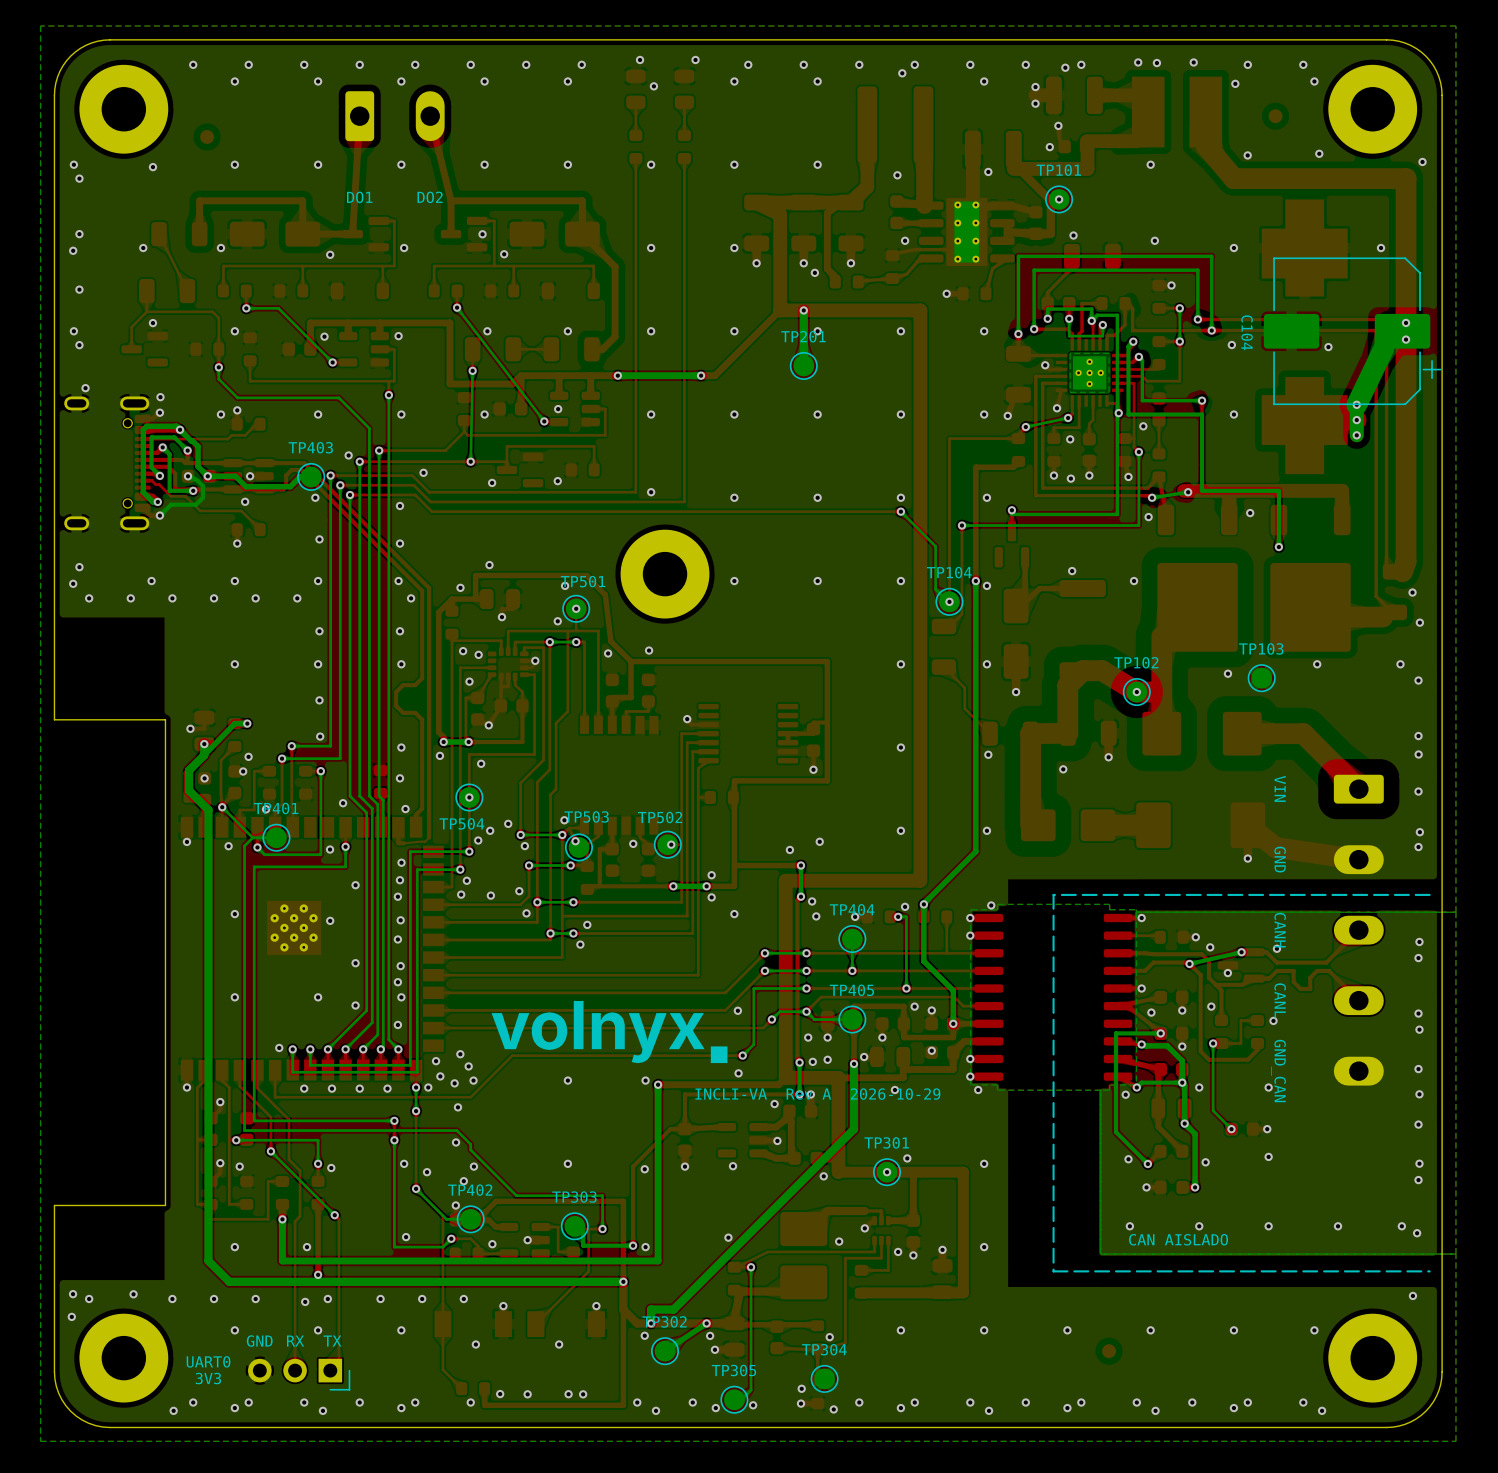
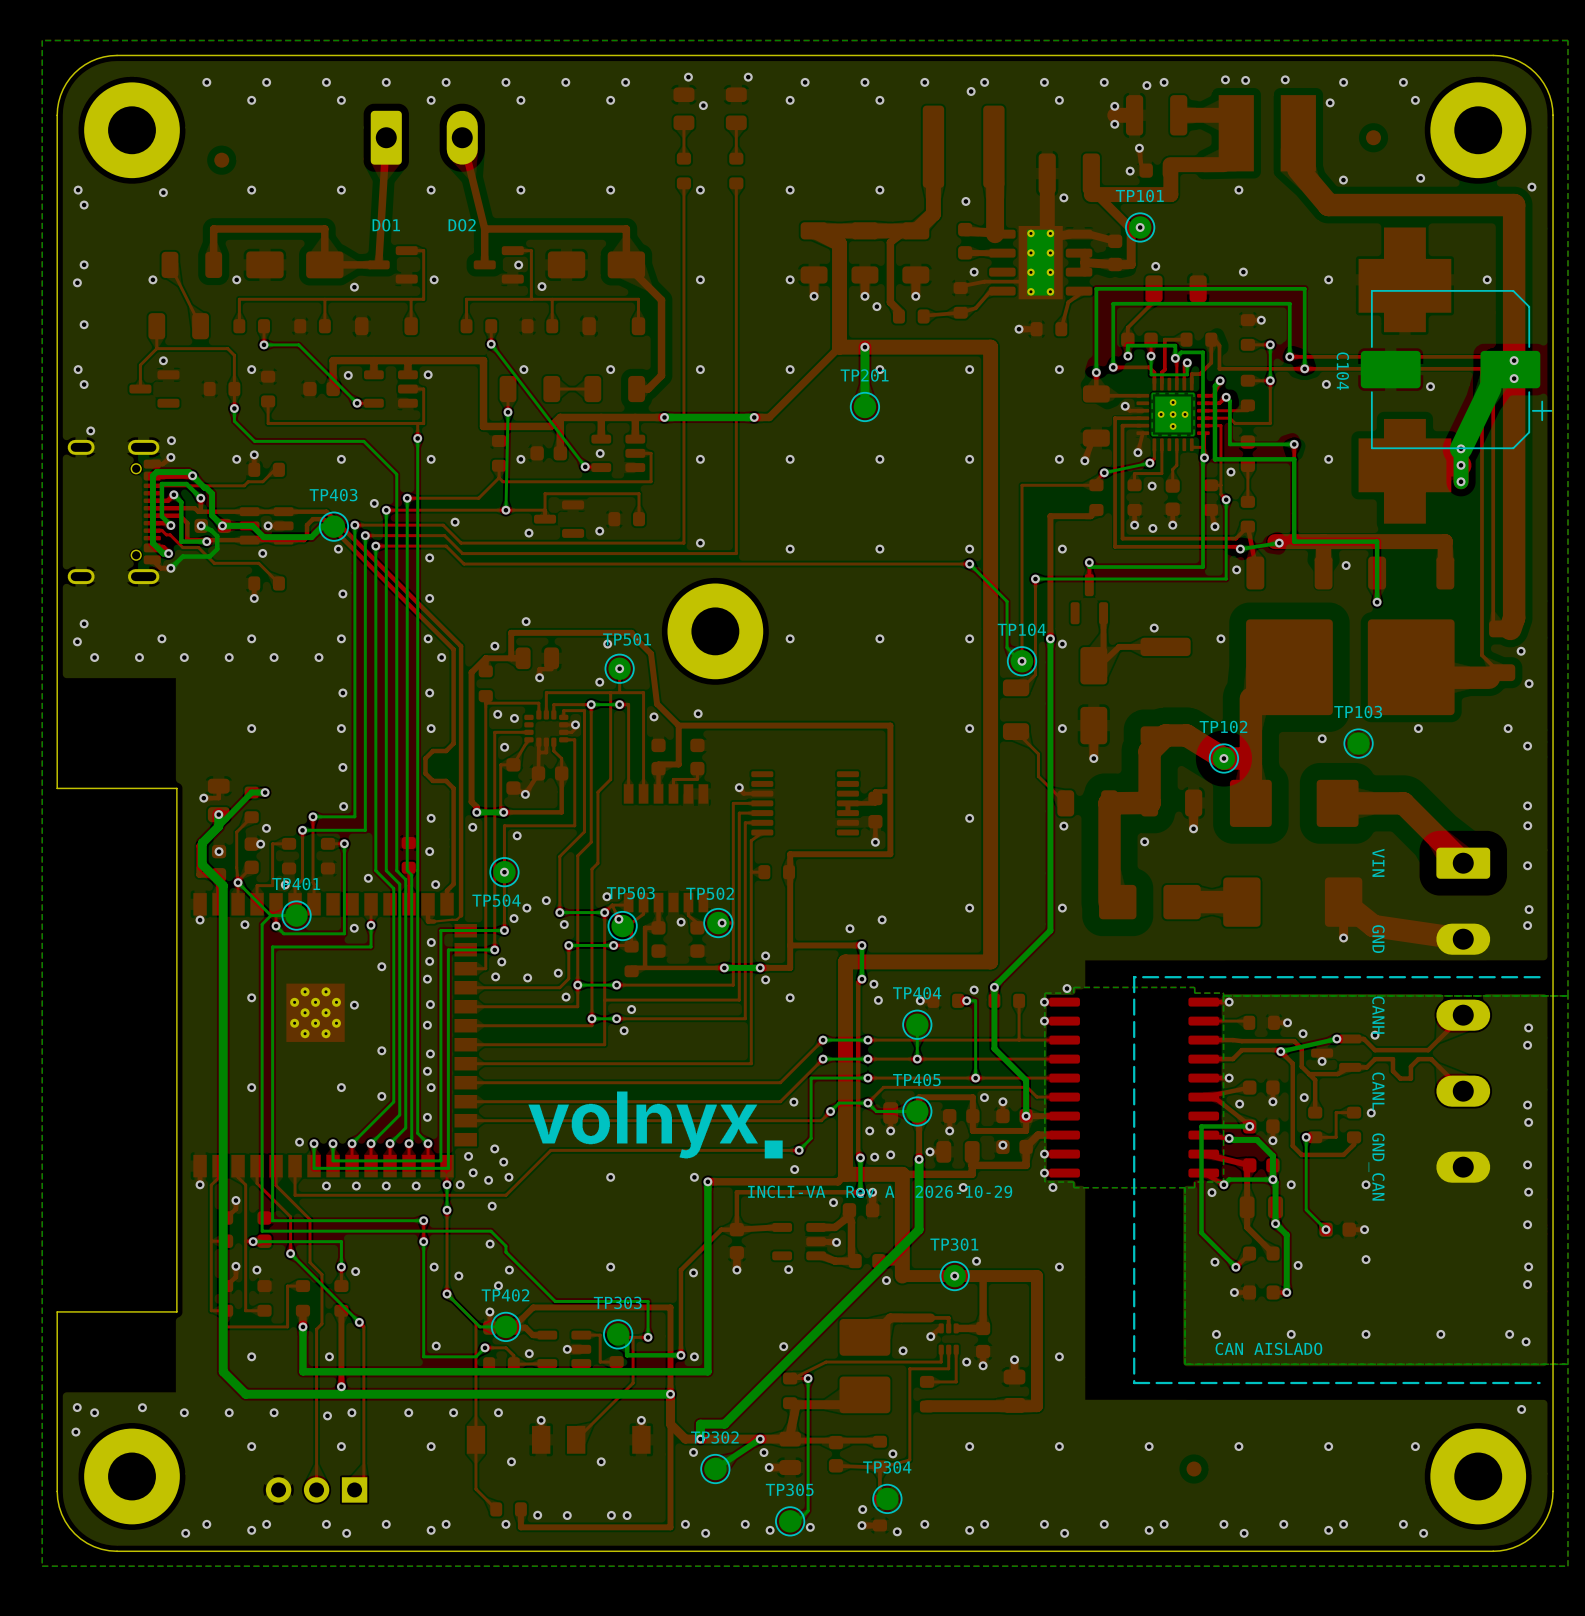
text: GND (259, 1341) -> none
text: RX (295, 1341) -> none
text: TX (332, 1341) -> none
text: UART0 (208, 1361) -> none
line: (349, 1370) (349, 1389) (330, 1389) -> none
text: 3V3 (208, 1378) -> none

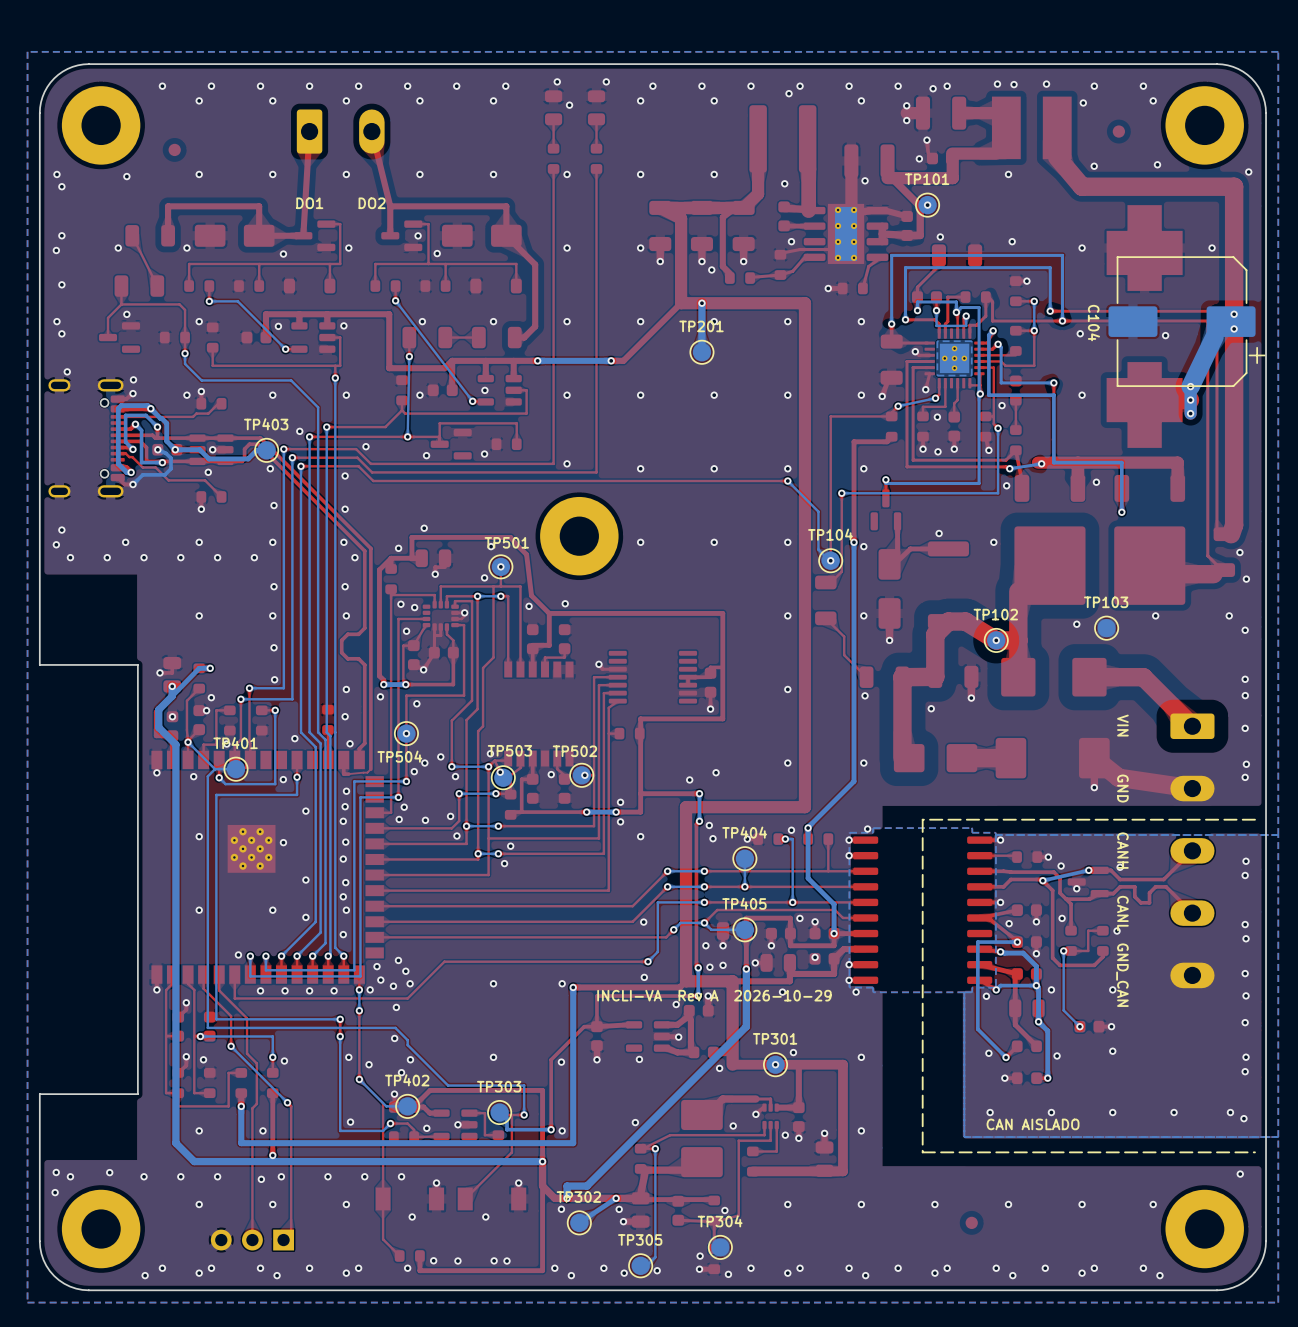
drawing: [528, 1091, 783, 1159] -> none

